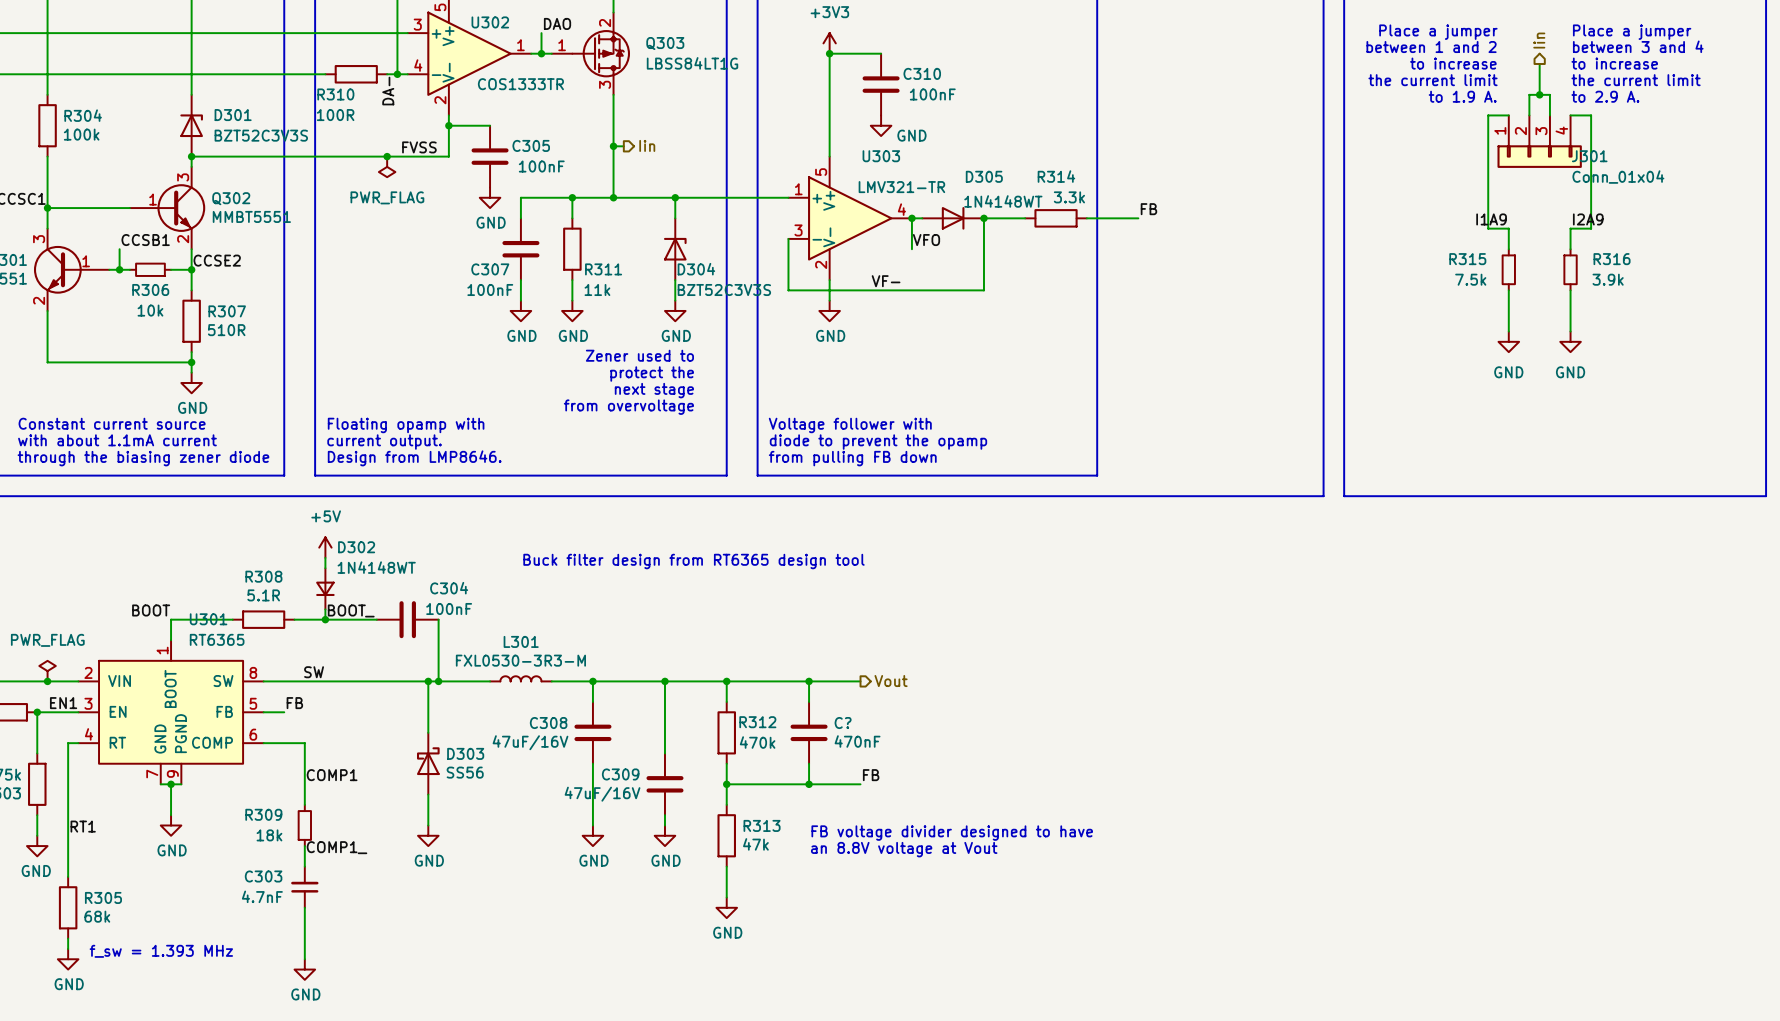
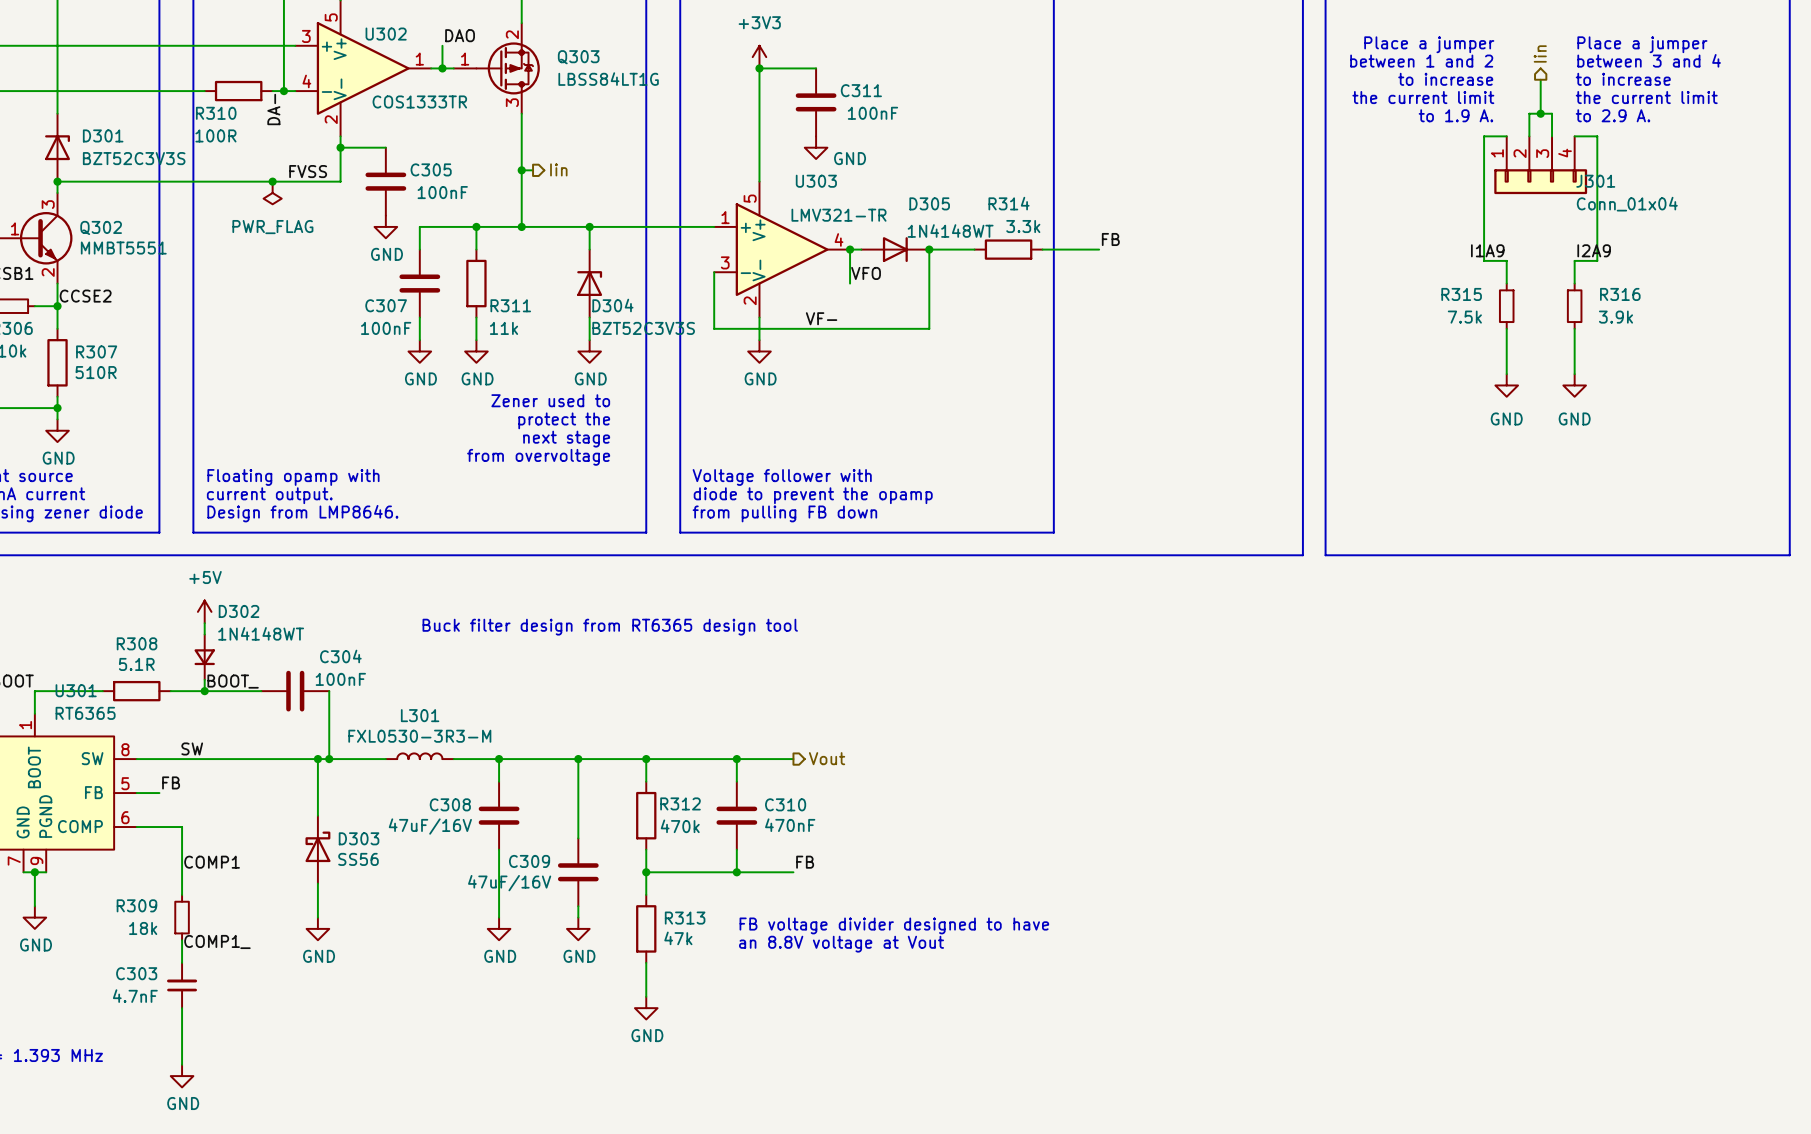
C310 name: C310 (922, 73) -> C311 (861, 90)
C? name: C? (843, 723) -> C310 (785, 804)

